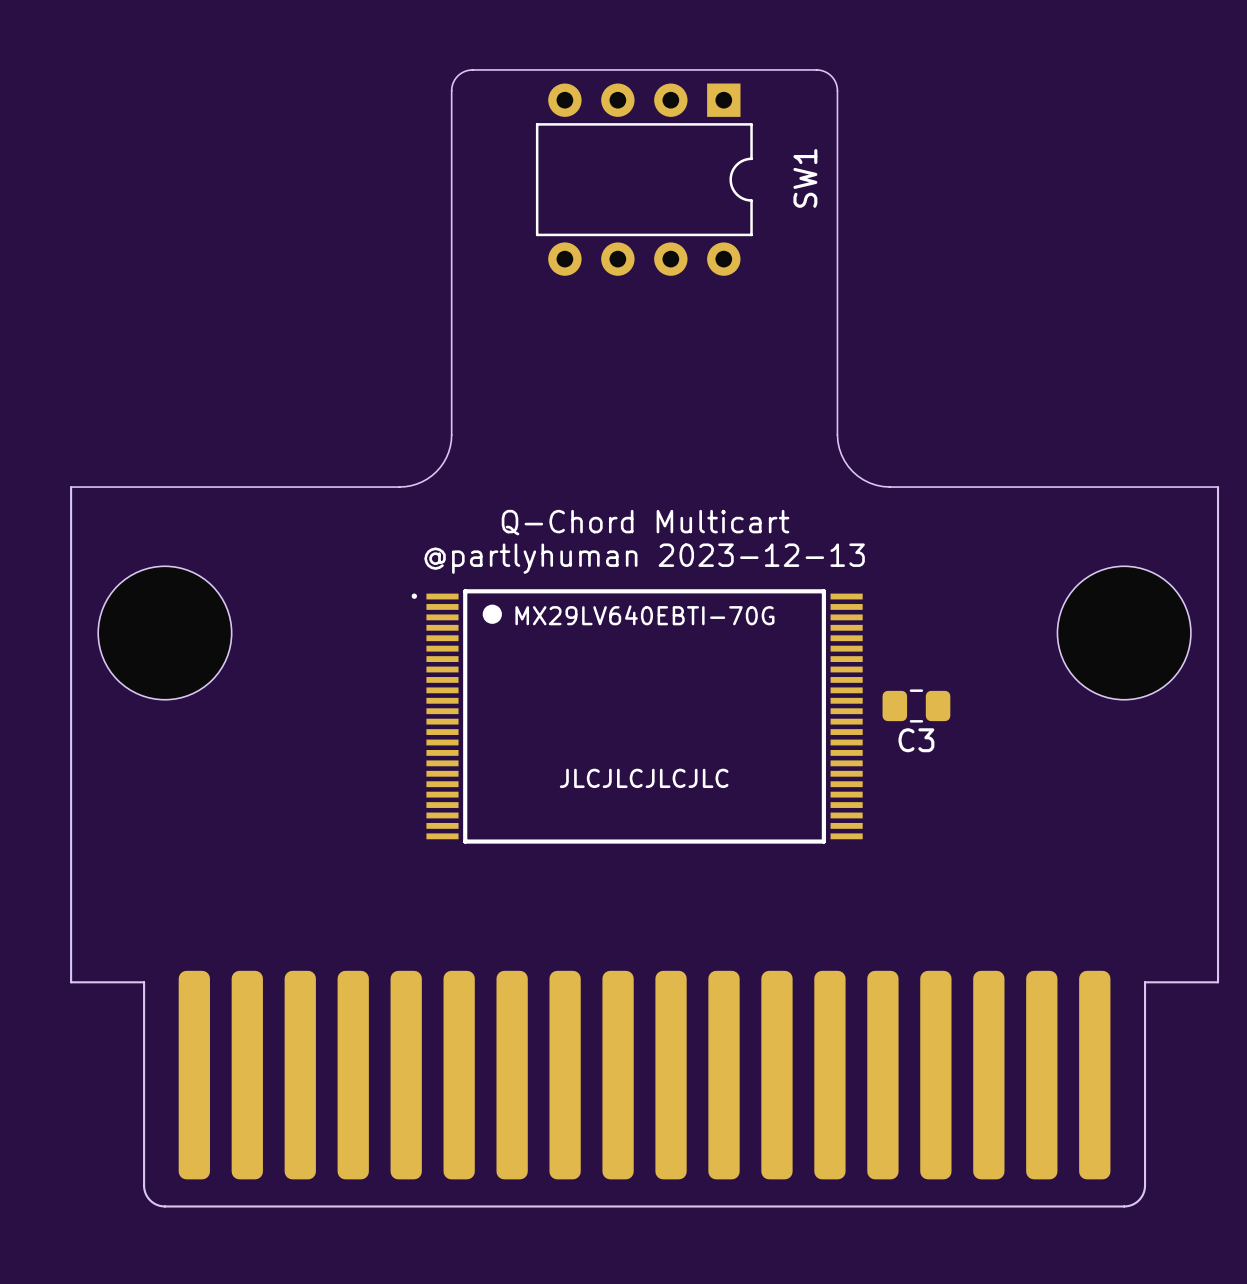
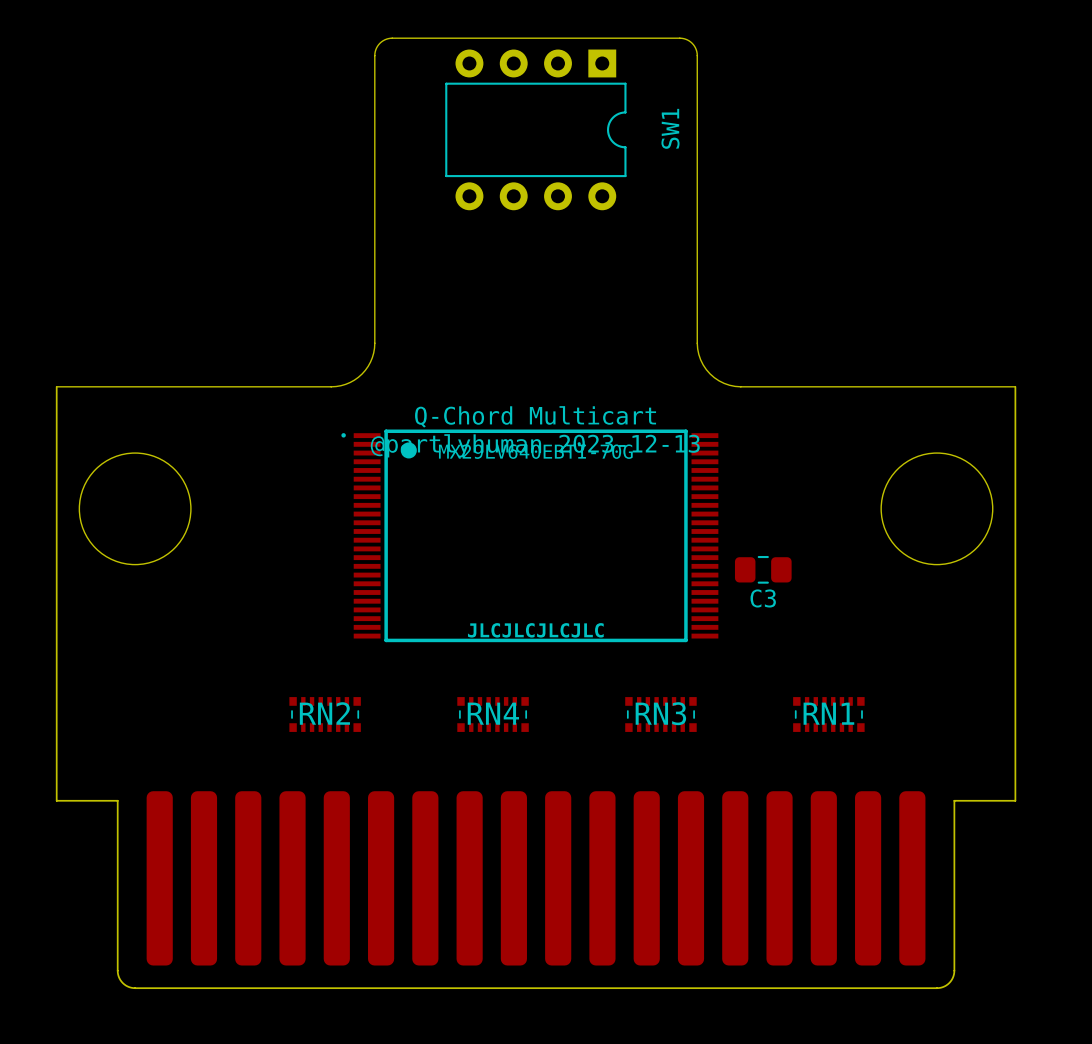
part position: (637, 716) -> (529, 535)
RN2: none -> (325, 714)
RN4: none -> (493, 714)
RN3: none -> (660, 714)
RN1: none -> (828, 714)

